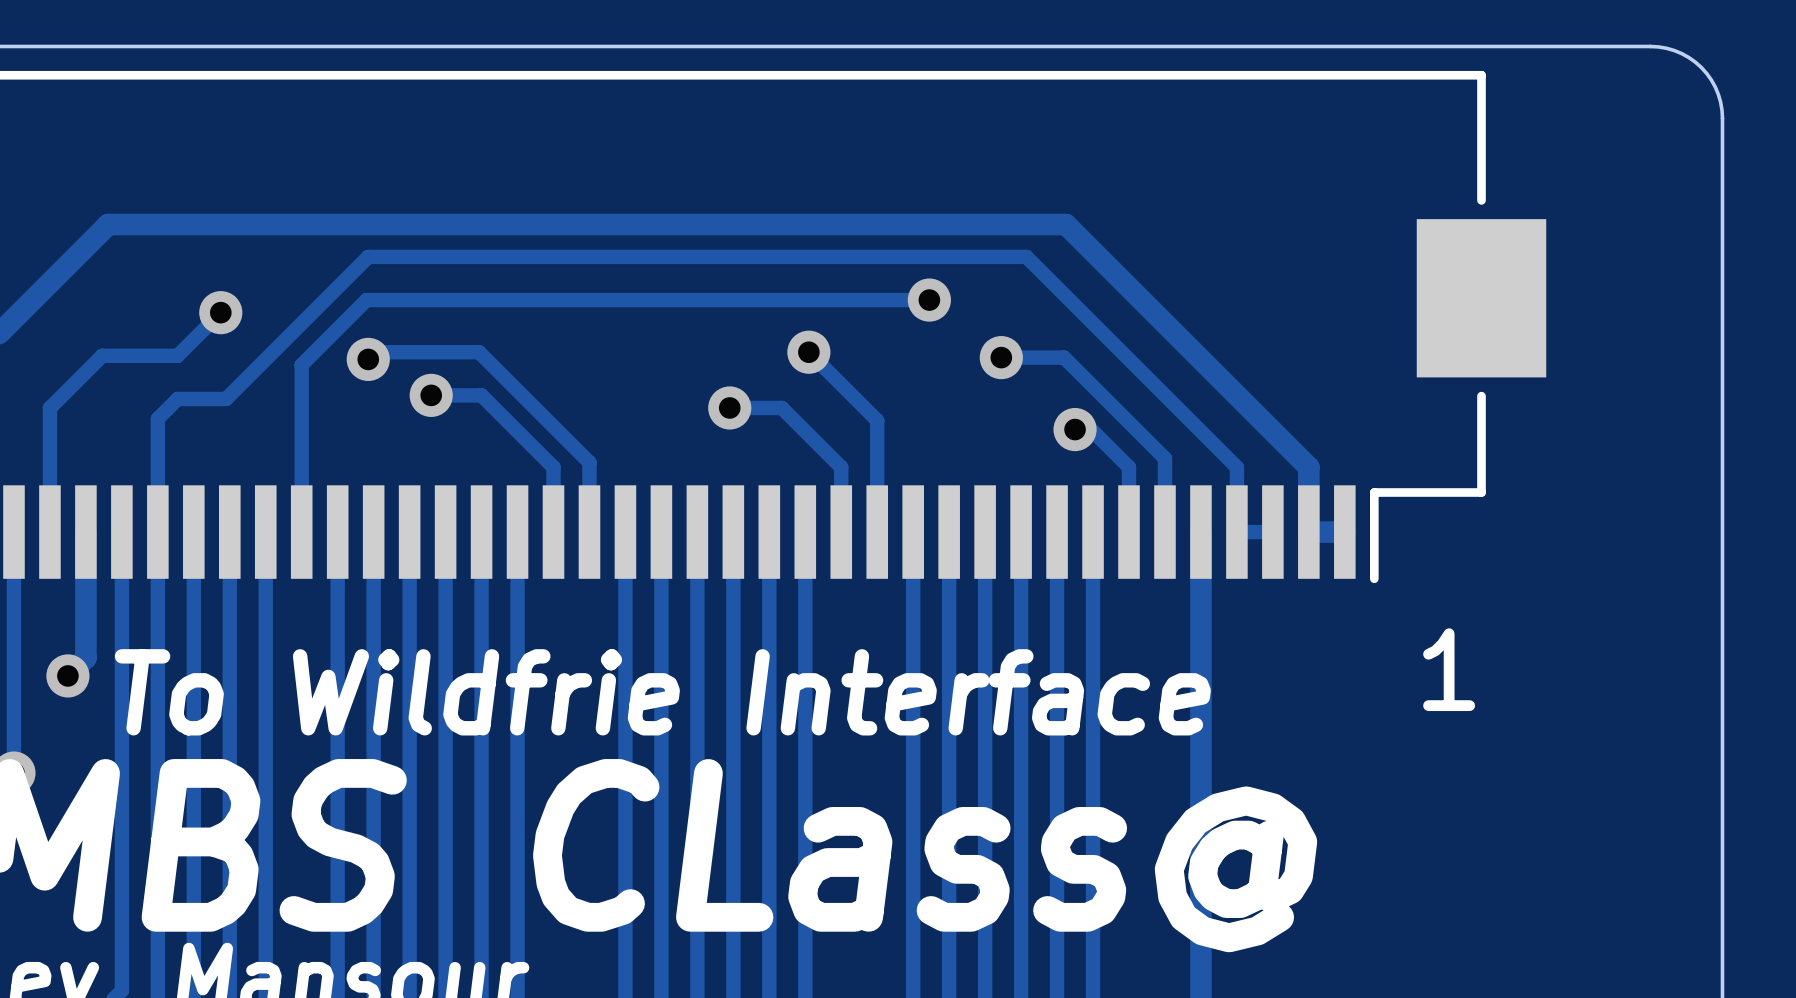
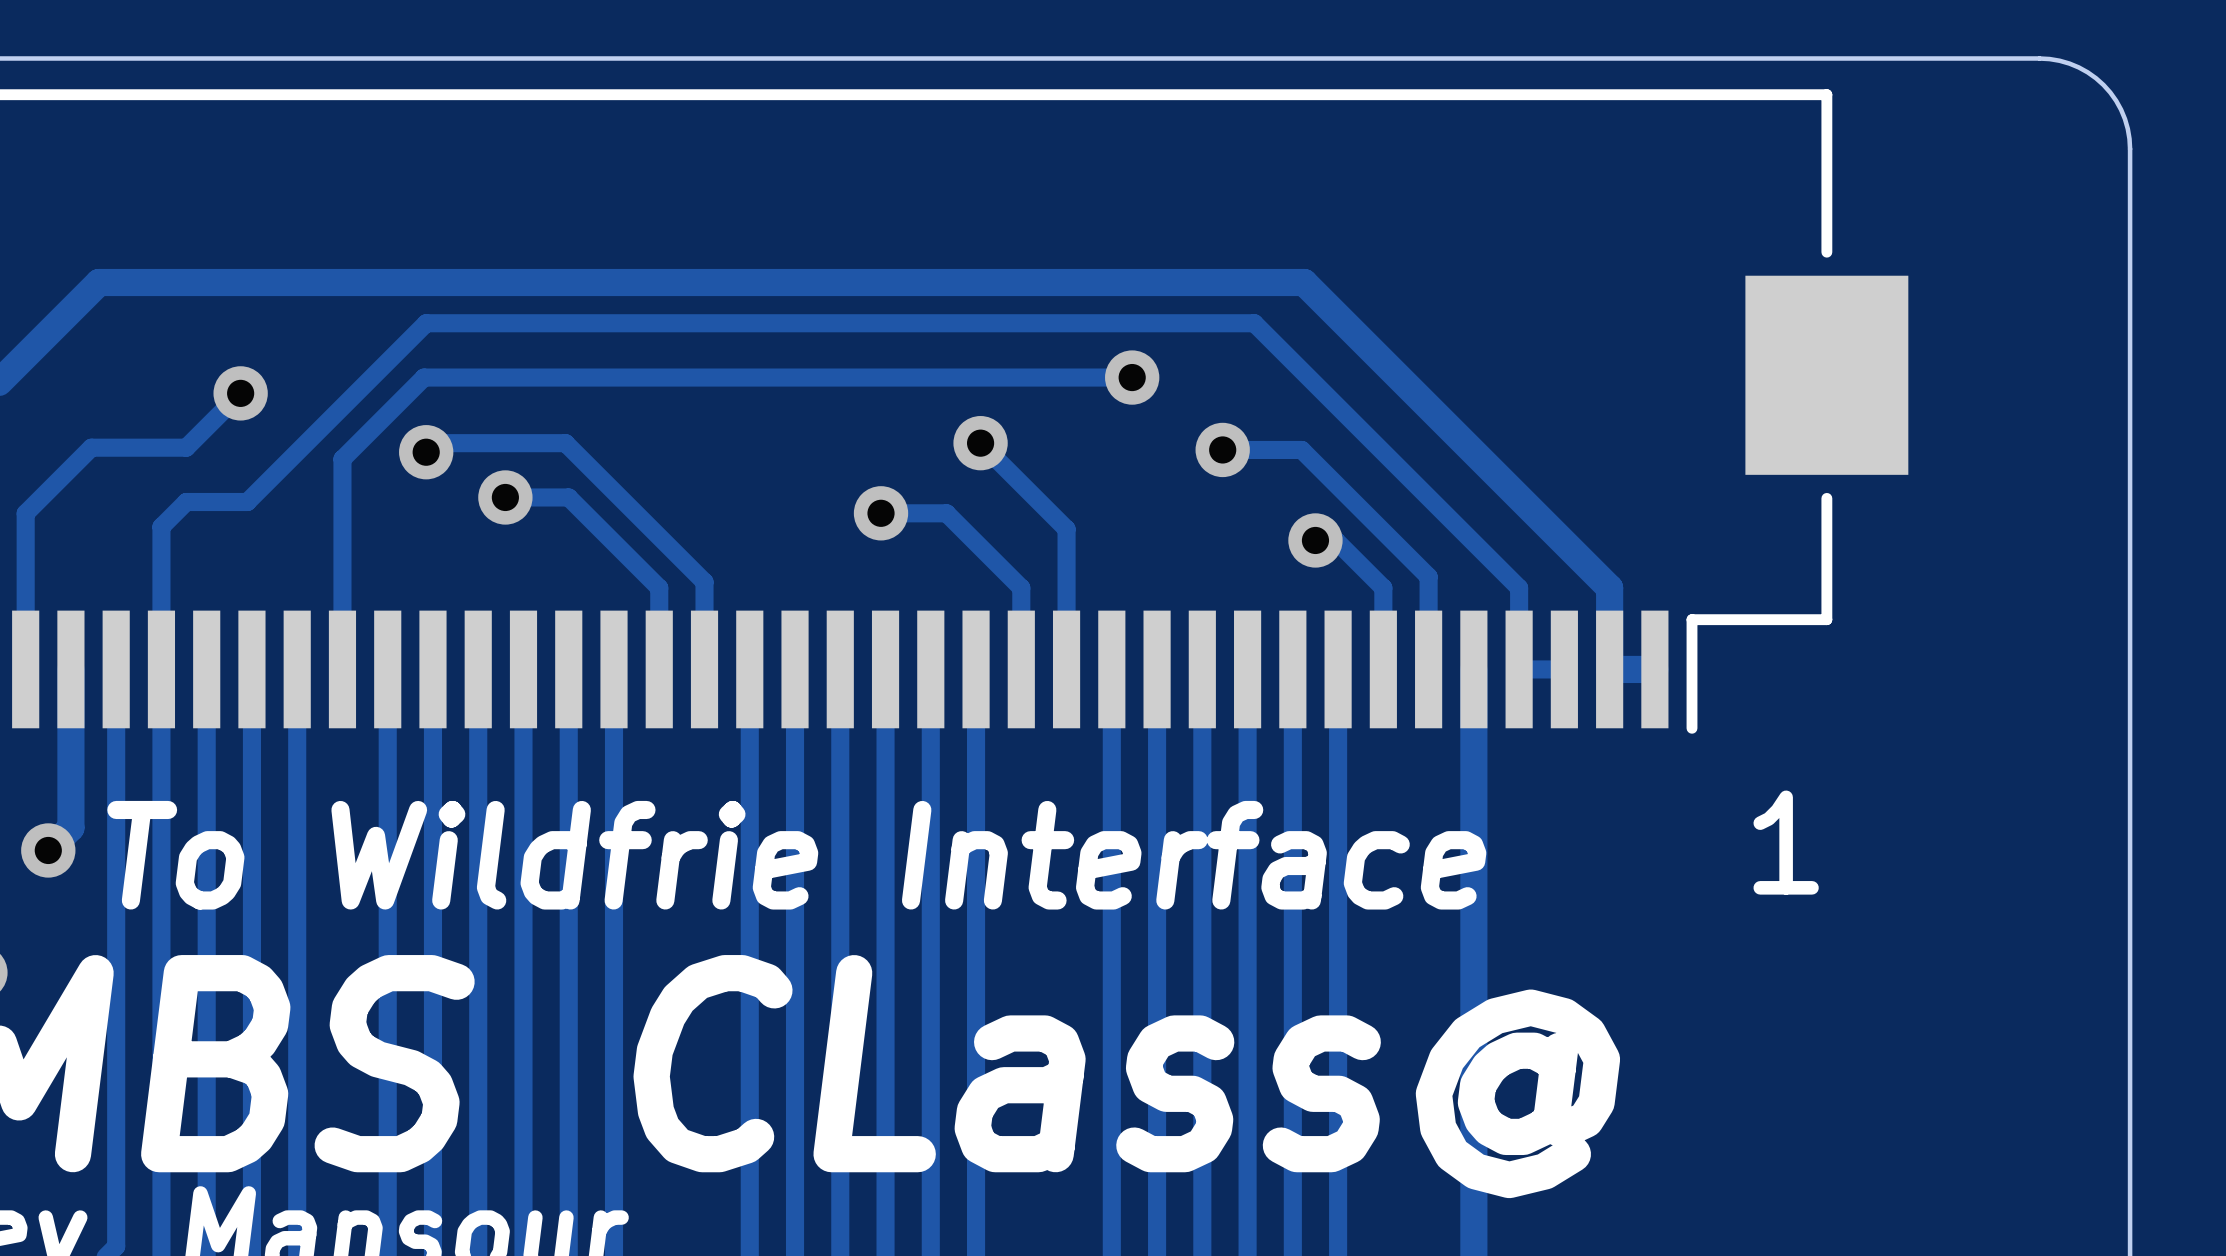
text position: To Wildfrie Interface (662, 692) -> To Wildfrie Interface (796, 855)

